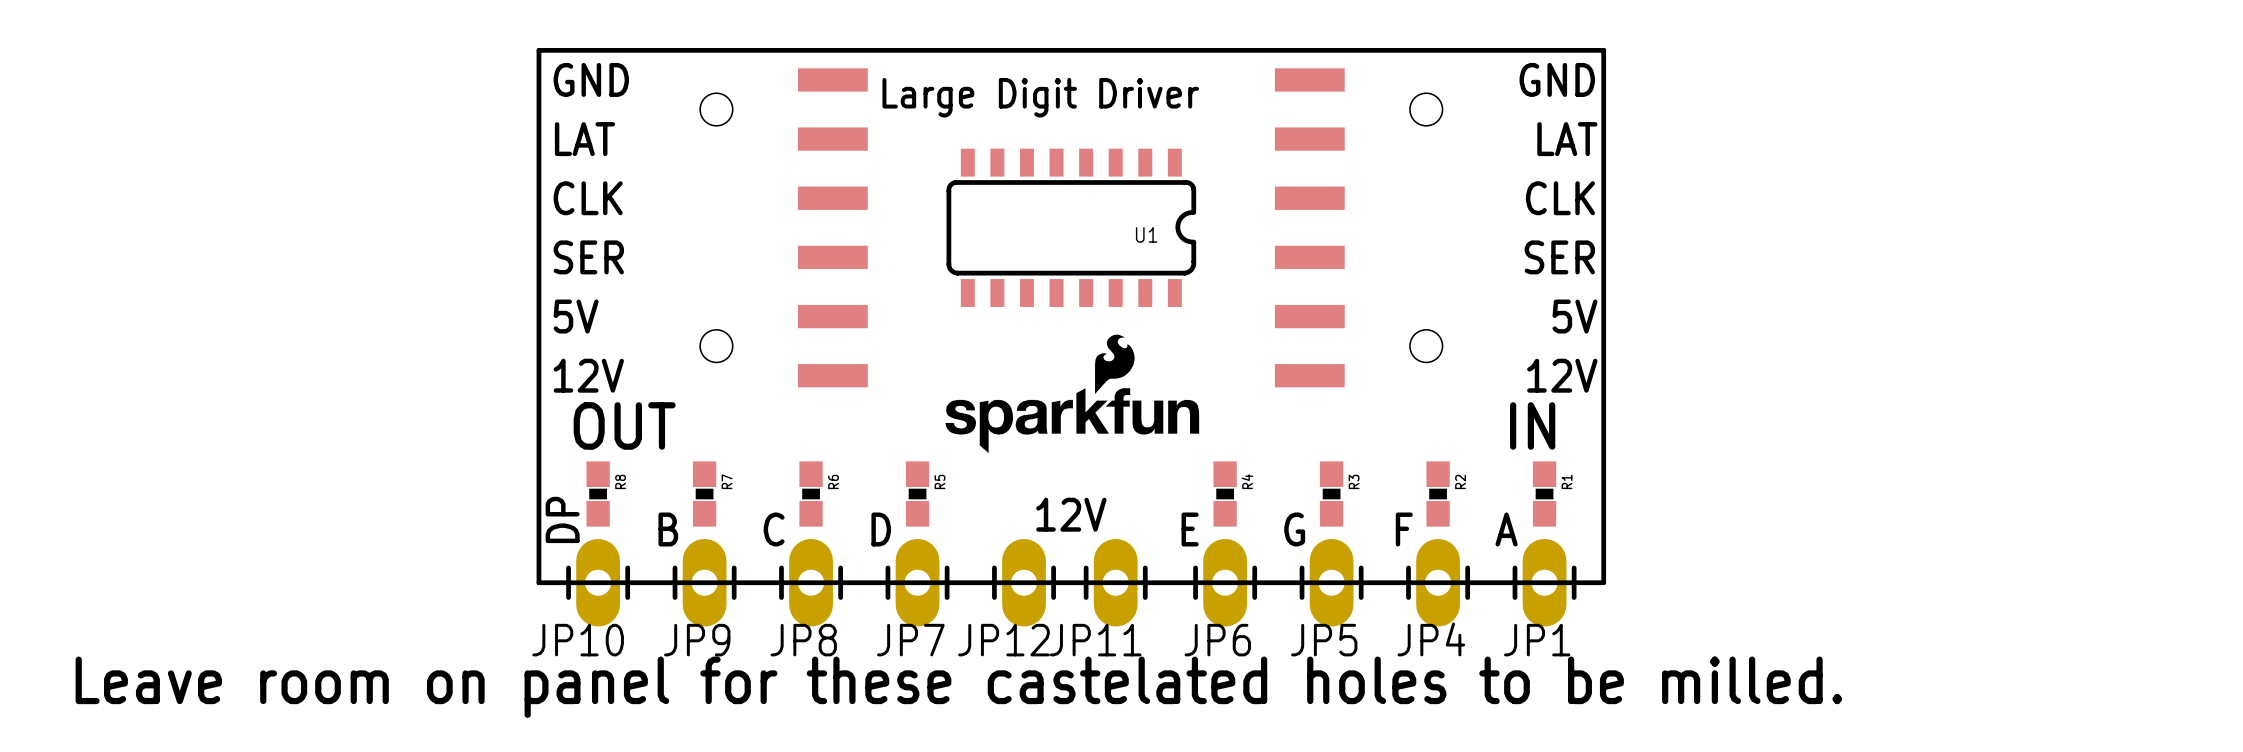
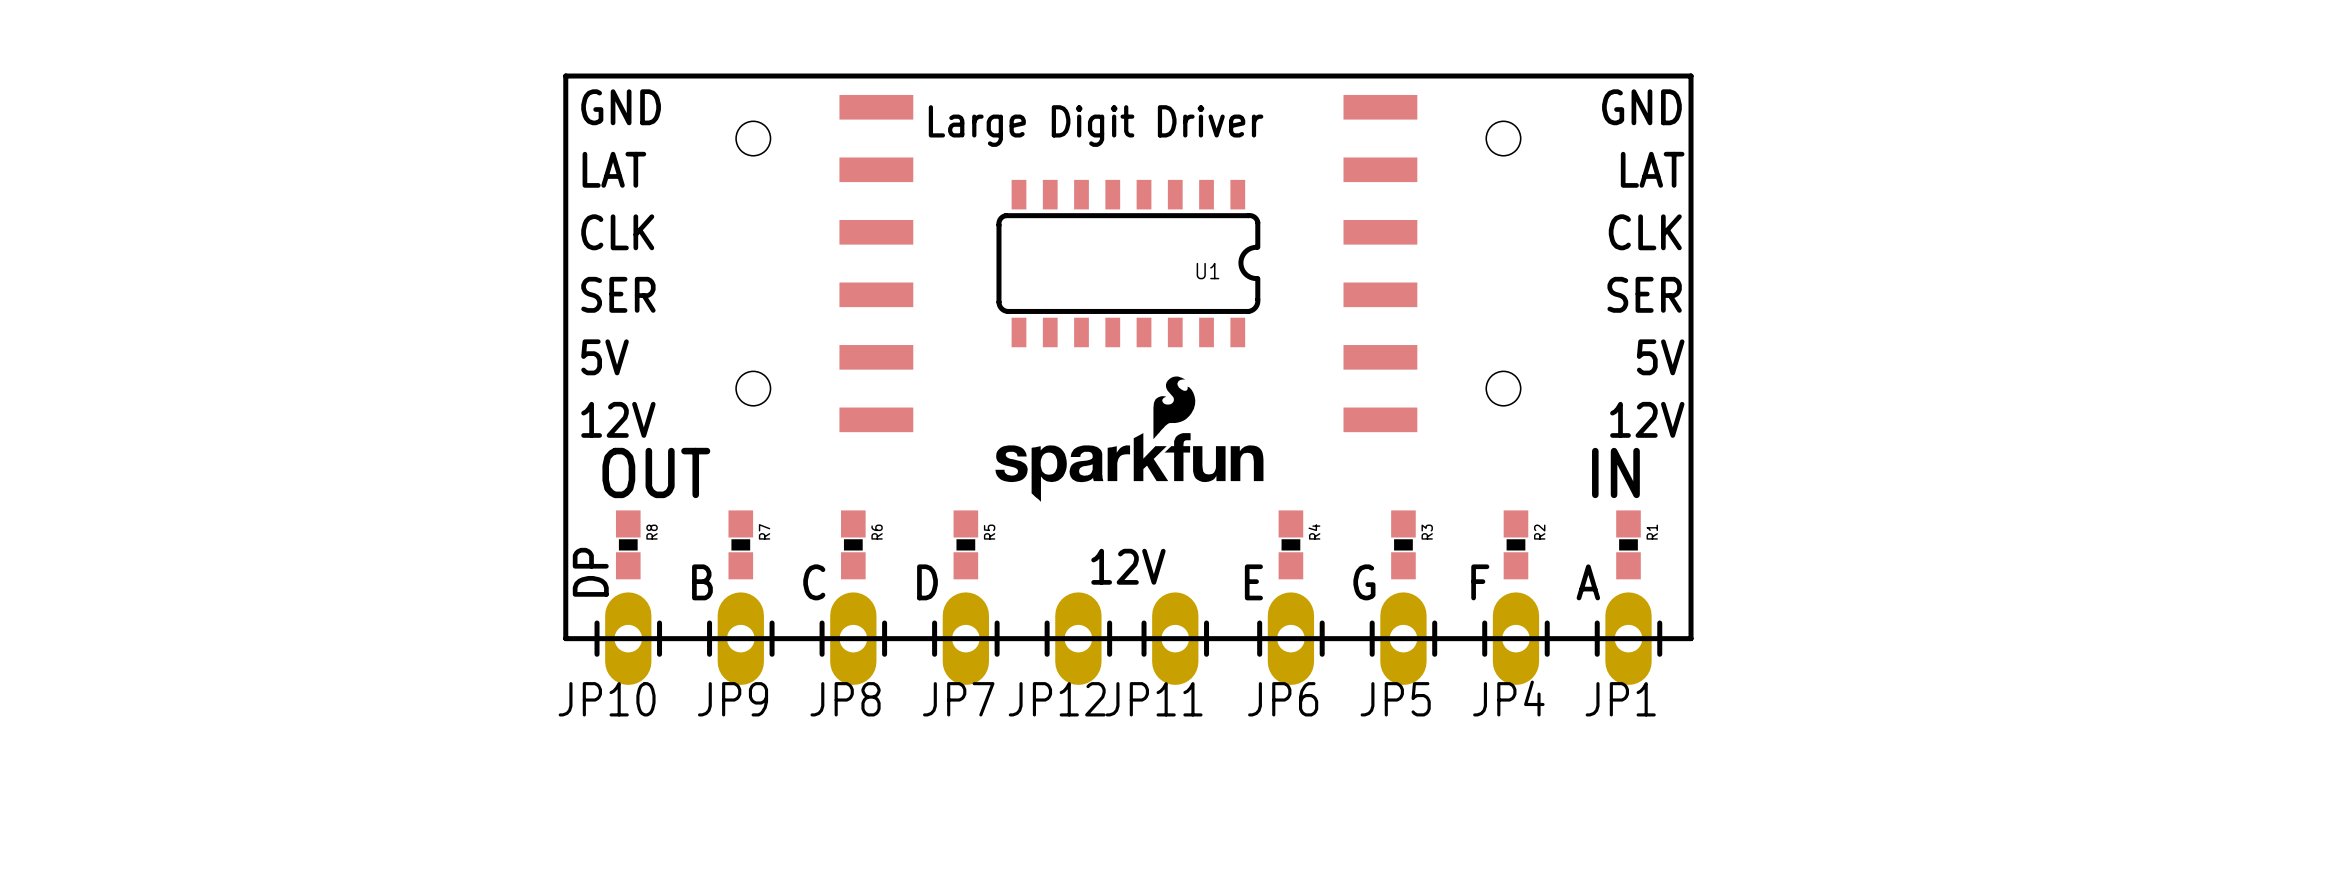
text: Leave room on panel for these castelated holes to be milled. (958, 687) -> none

